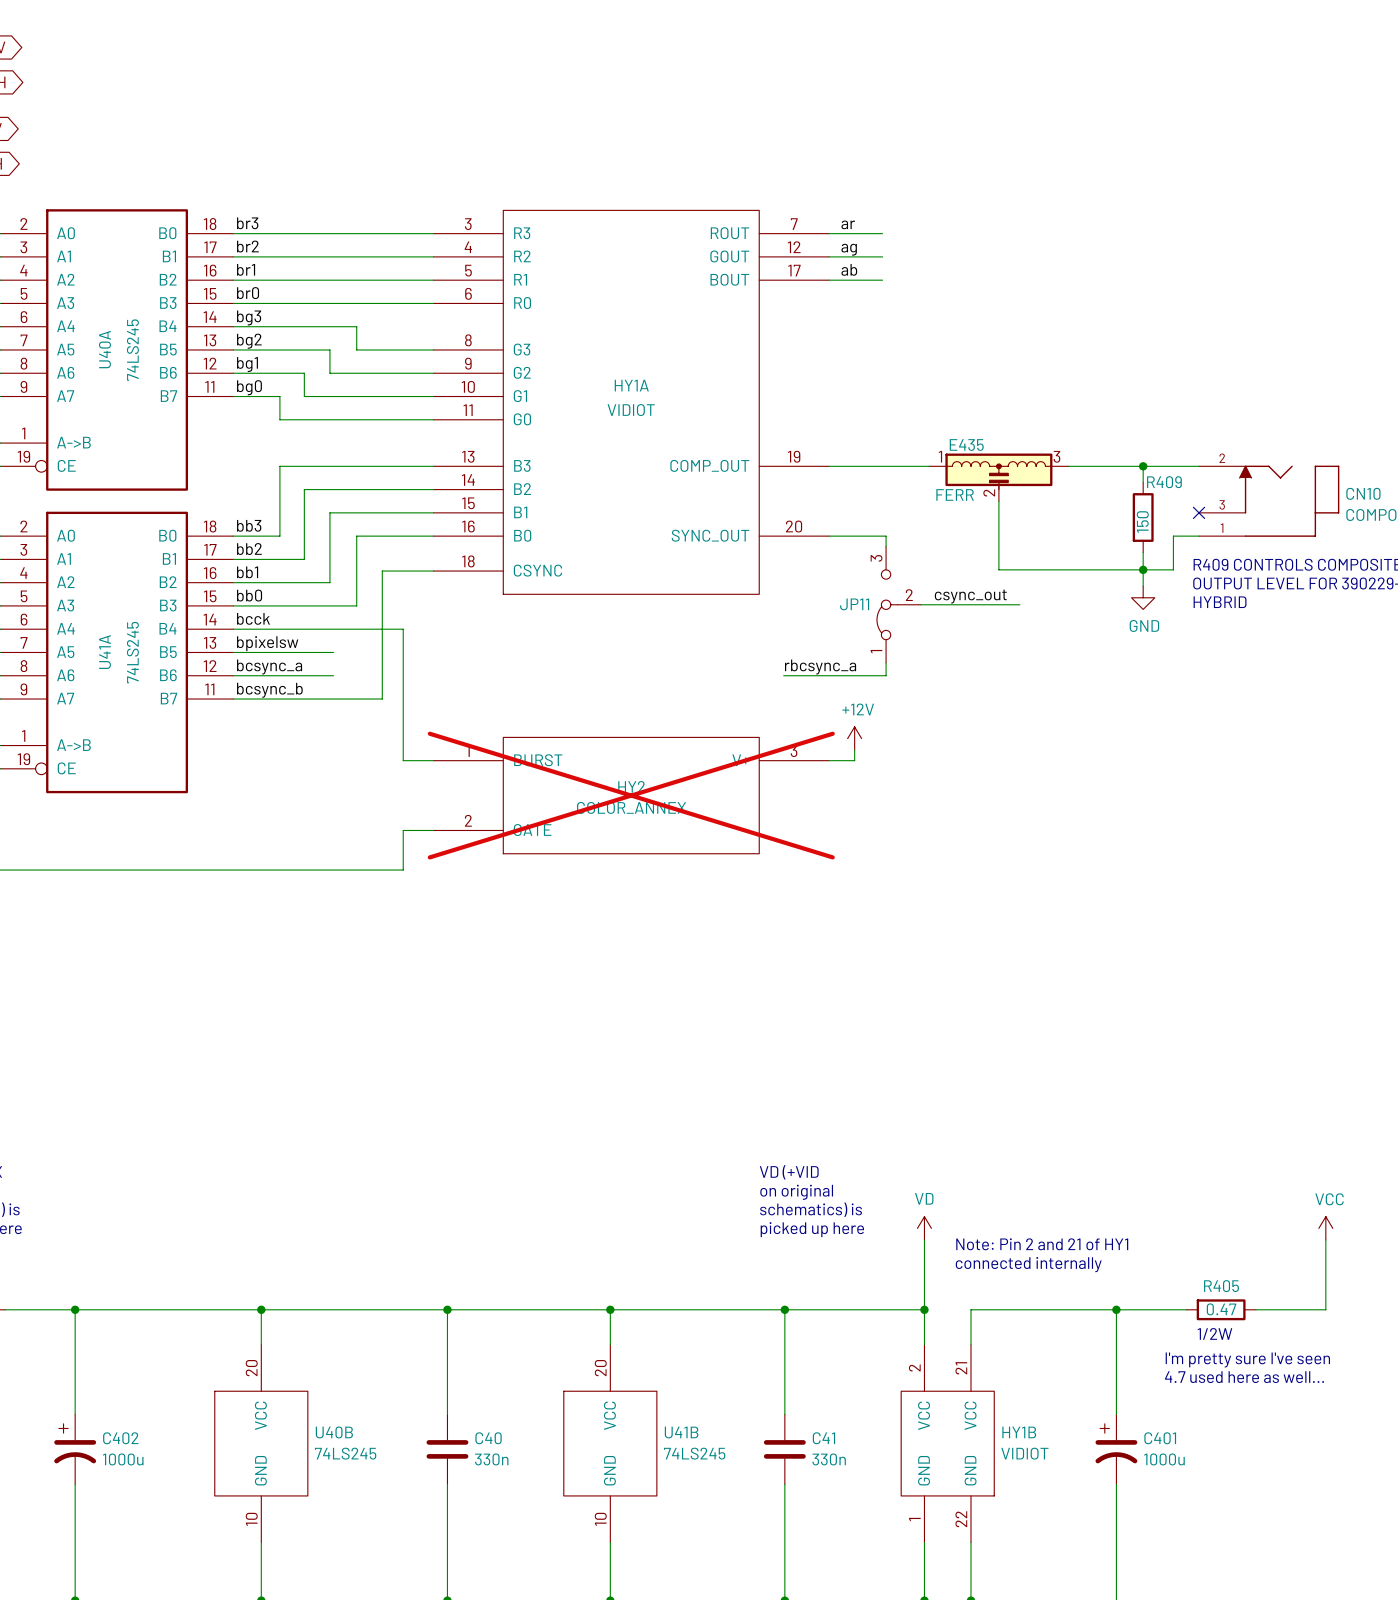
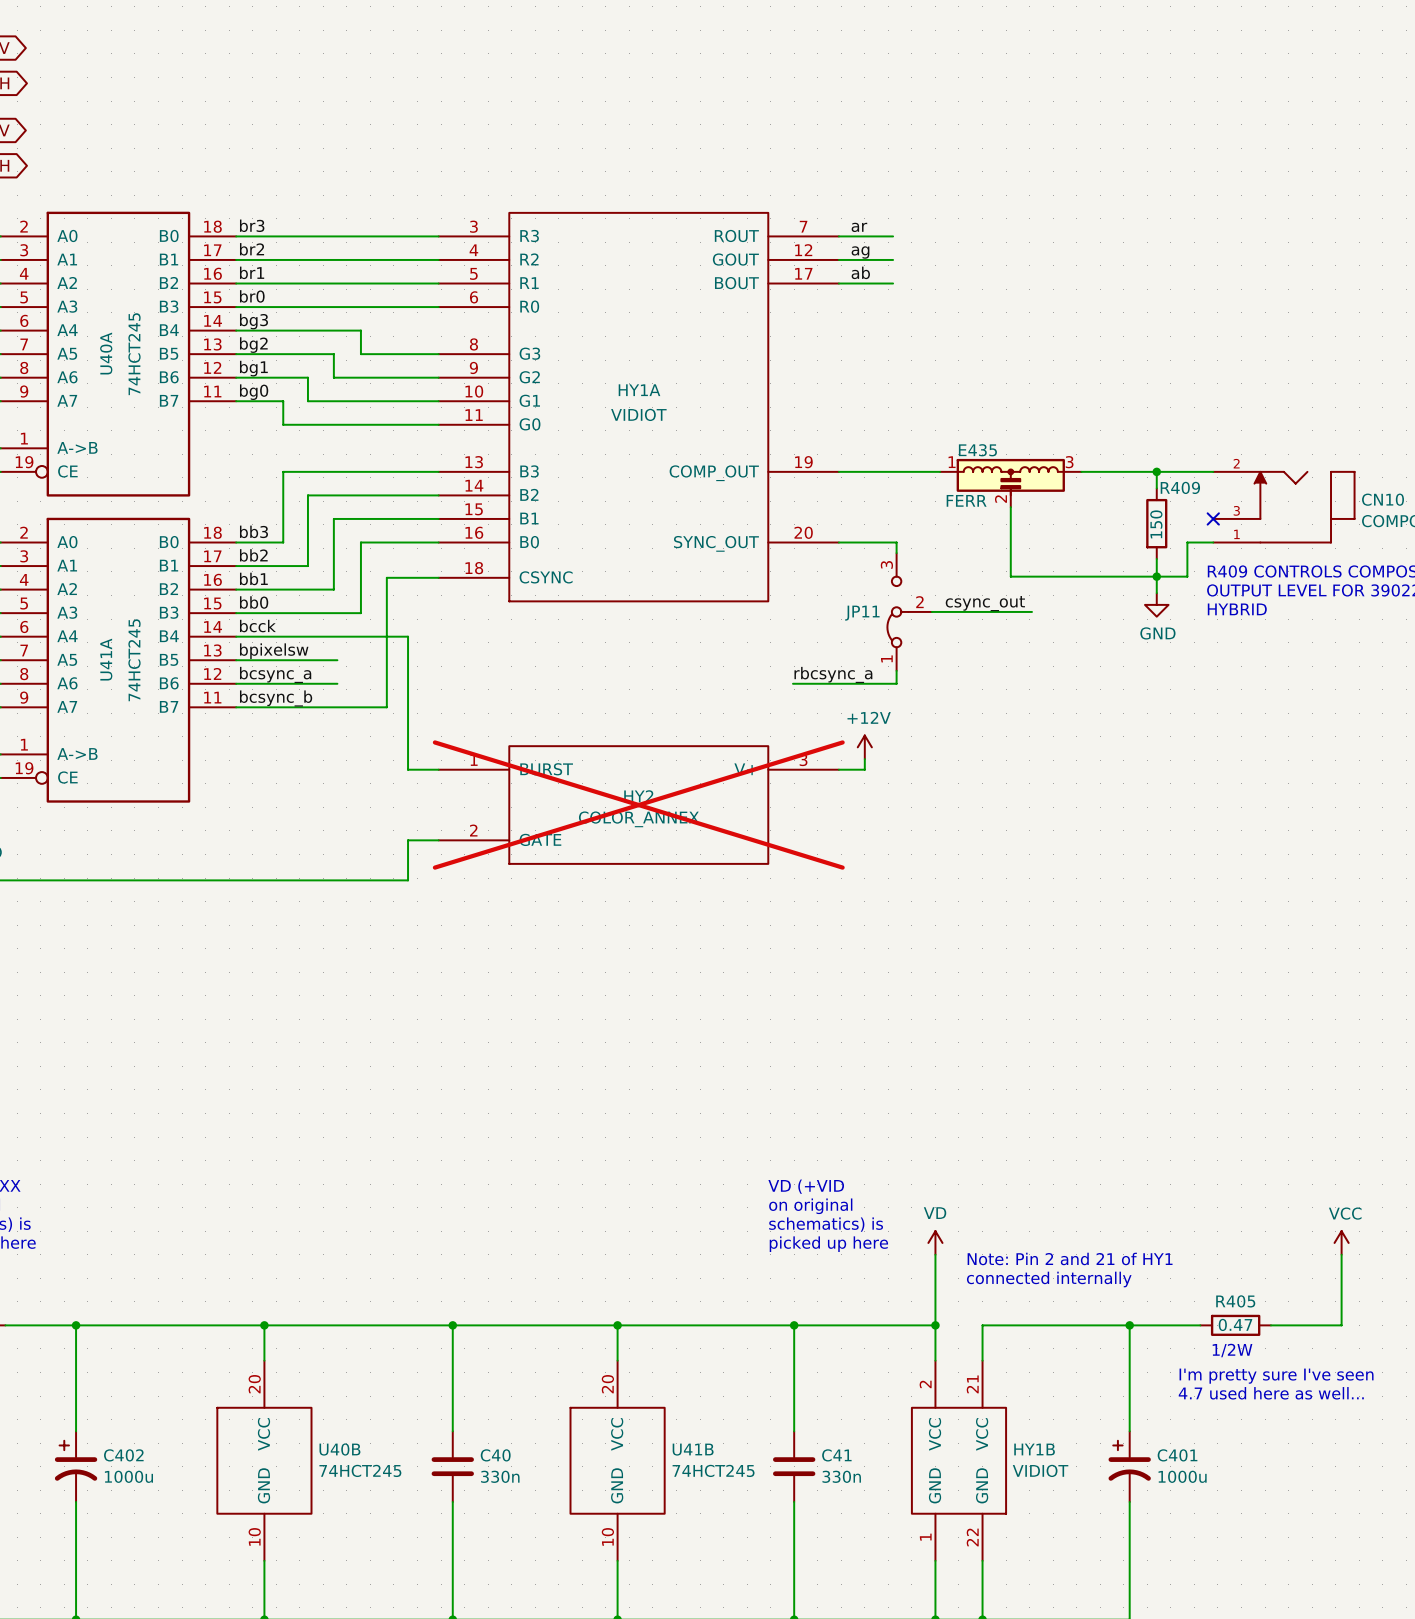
U40A value: 74LS245 (132, 350) -> 74HCT245 (134, 354)
U41A value: 74LS245 (132, 652) -> 74HCT245 (134, 660)
U40B value: 74LS245 (345, 1453) -> 74HCT245 (360, 1470)
U41B value: 74LS245 (694, 1453) -> 74HCT245 (713, 1470)

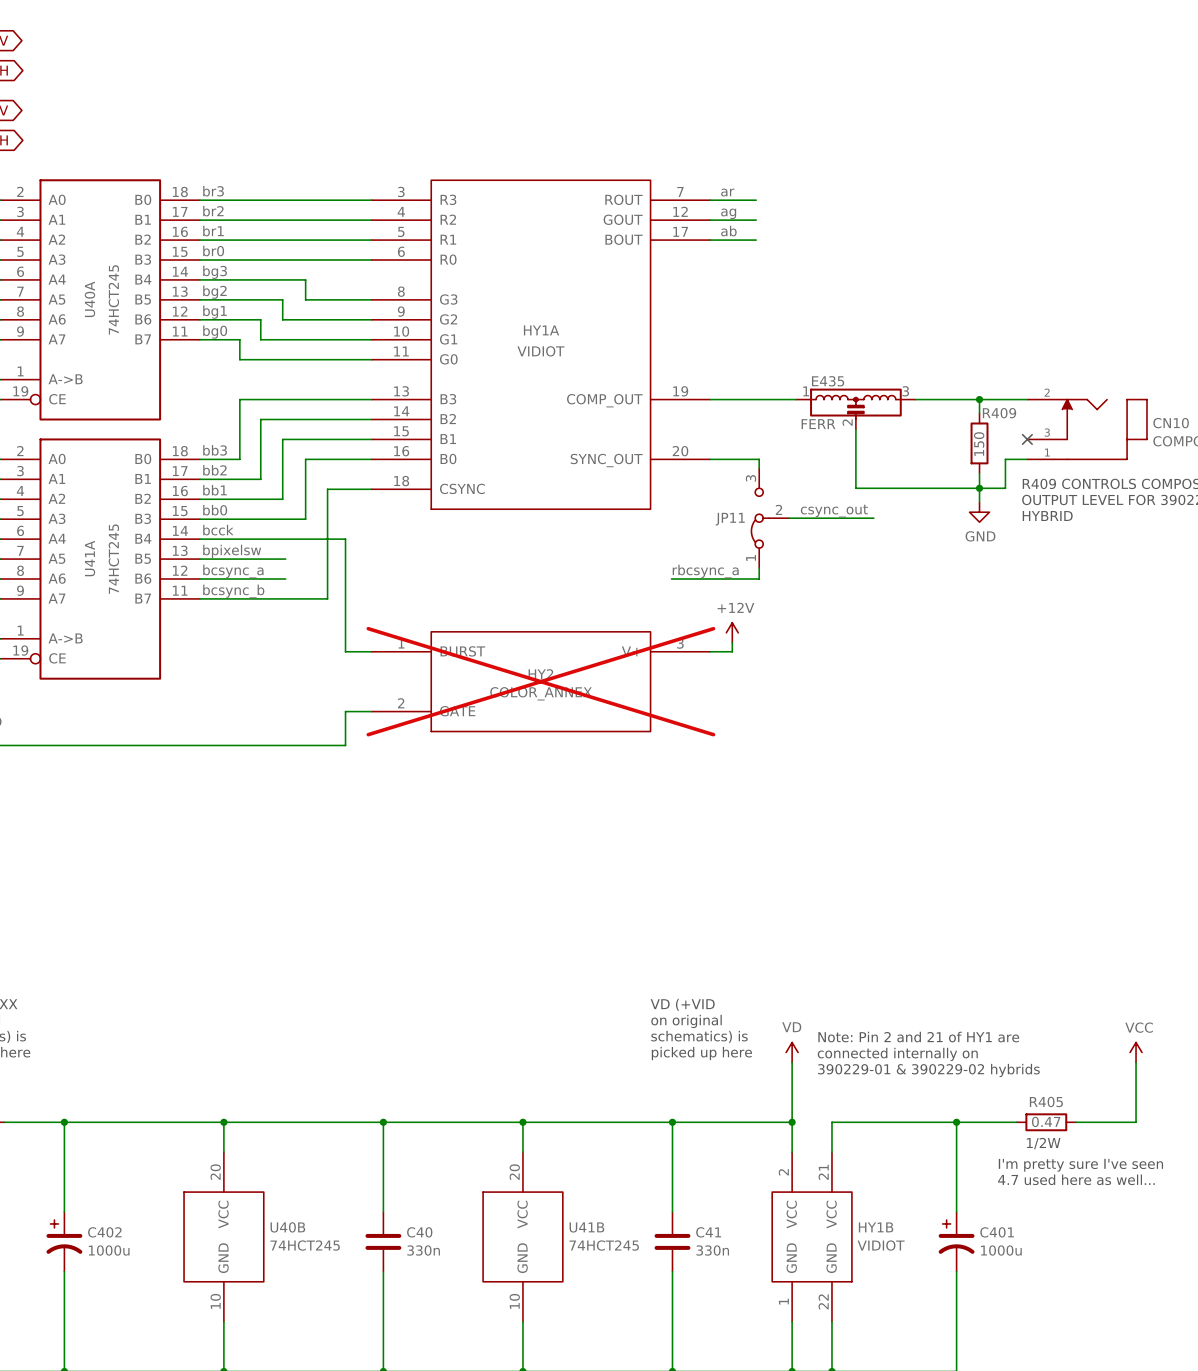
text: none -> Note: Pin 2 and 21 of HY1 are (918, 1037)
text: none -> connected internally on (897, 1054)
text: Note: Pin 2 and 21 of HY1 (1070, 1258) -> 390229-01 & 390229-02 hybrids (928, 1070)
text: connected internally (1049, 1279) -> none

